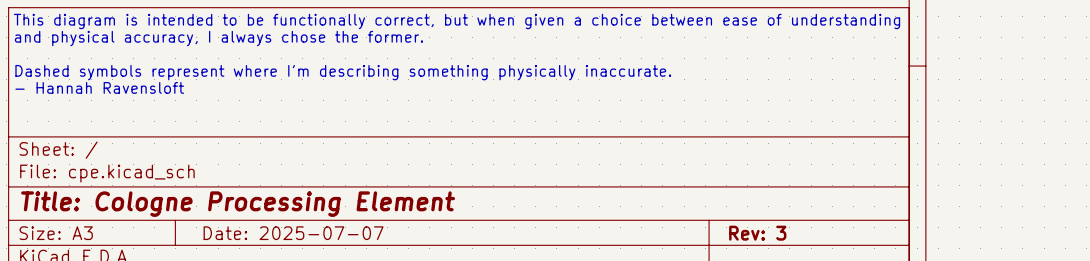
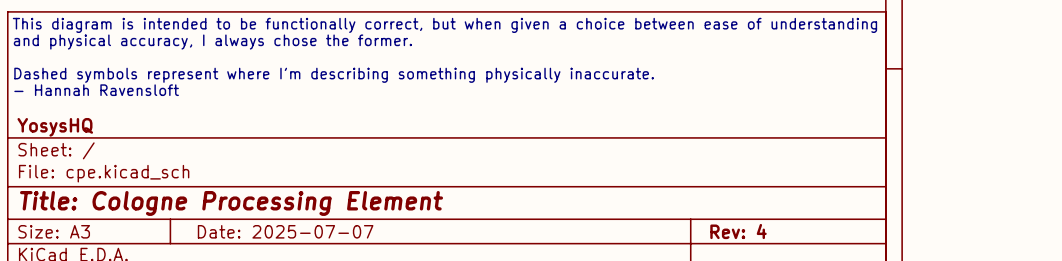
title block: none -> YosysHQ (55, 127)
title block: Rev: 3 (757, 233) -> Rev: 4 (738, 231)

